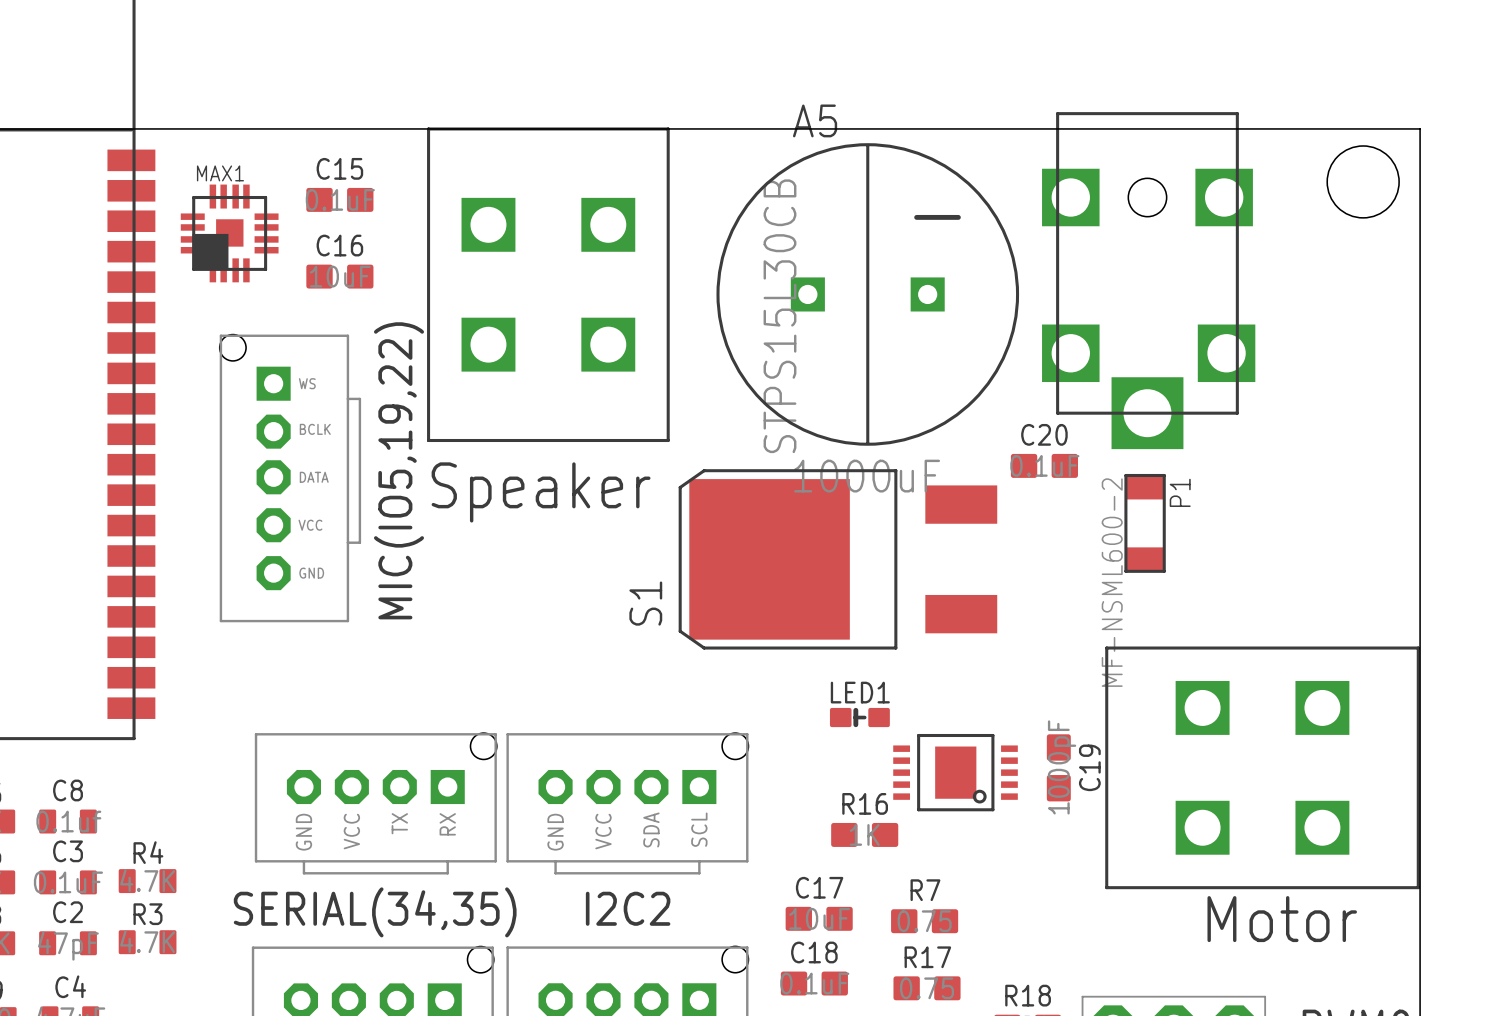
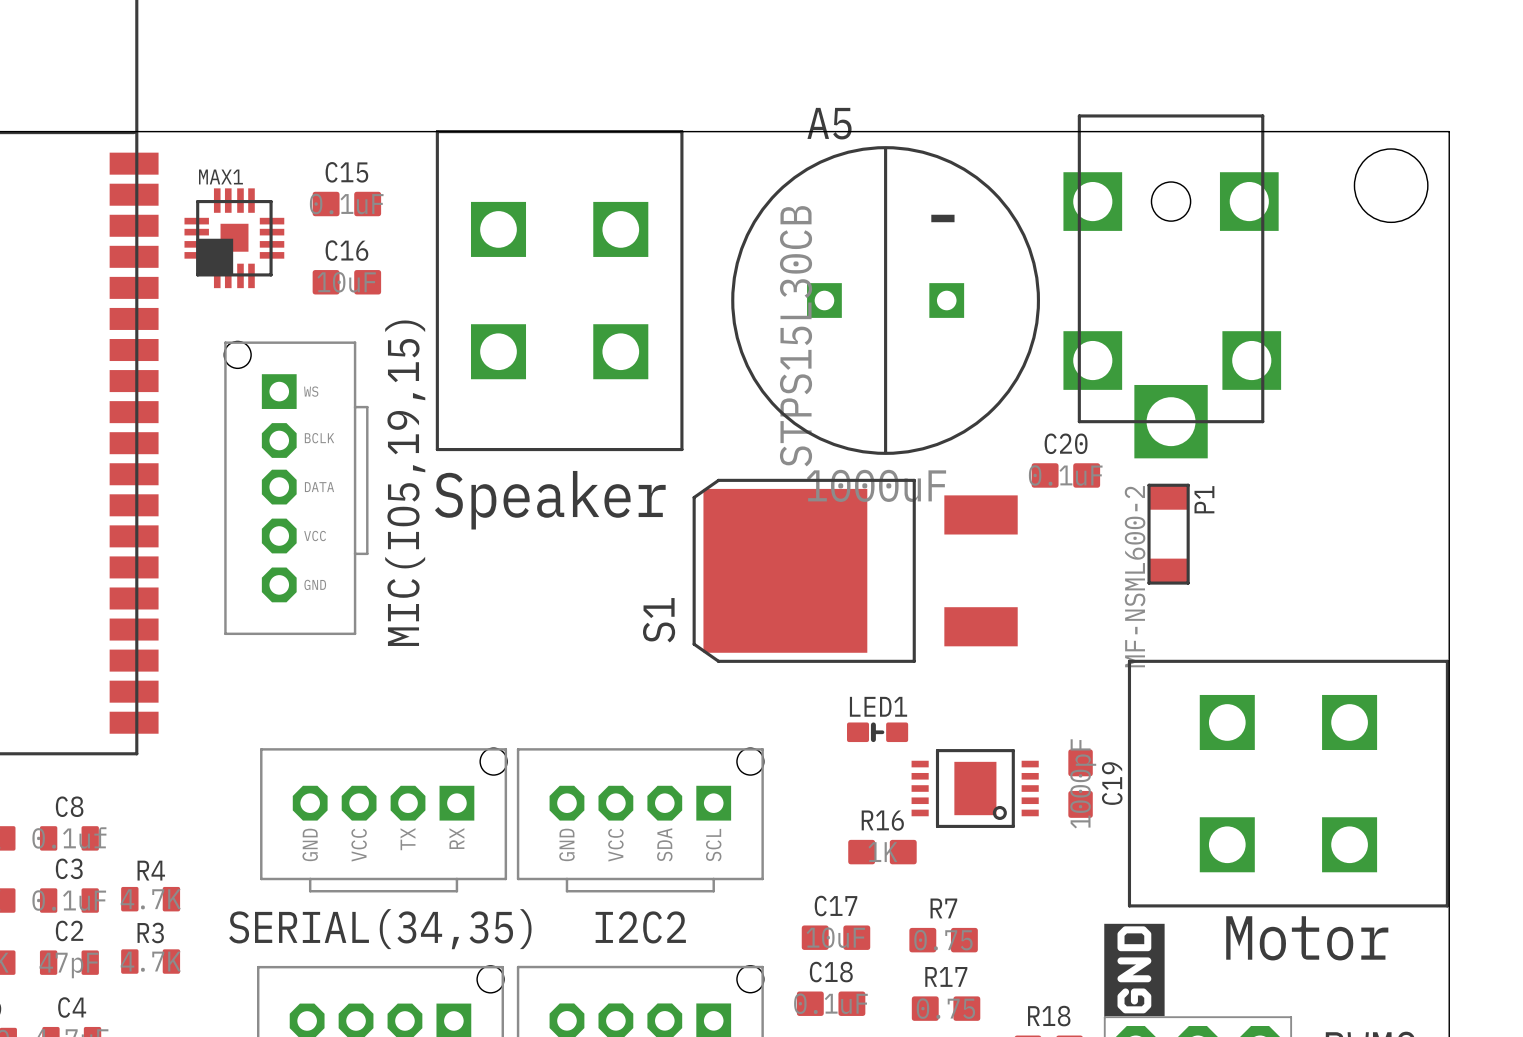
MIC(IO5,19,22) name: MIC(IO5,19,22) (398, 470) -> MIC(IO5,19,15) (405, 483)
drawing: none -> [1104, 923, 1165, 1017]

